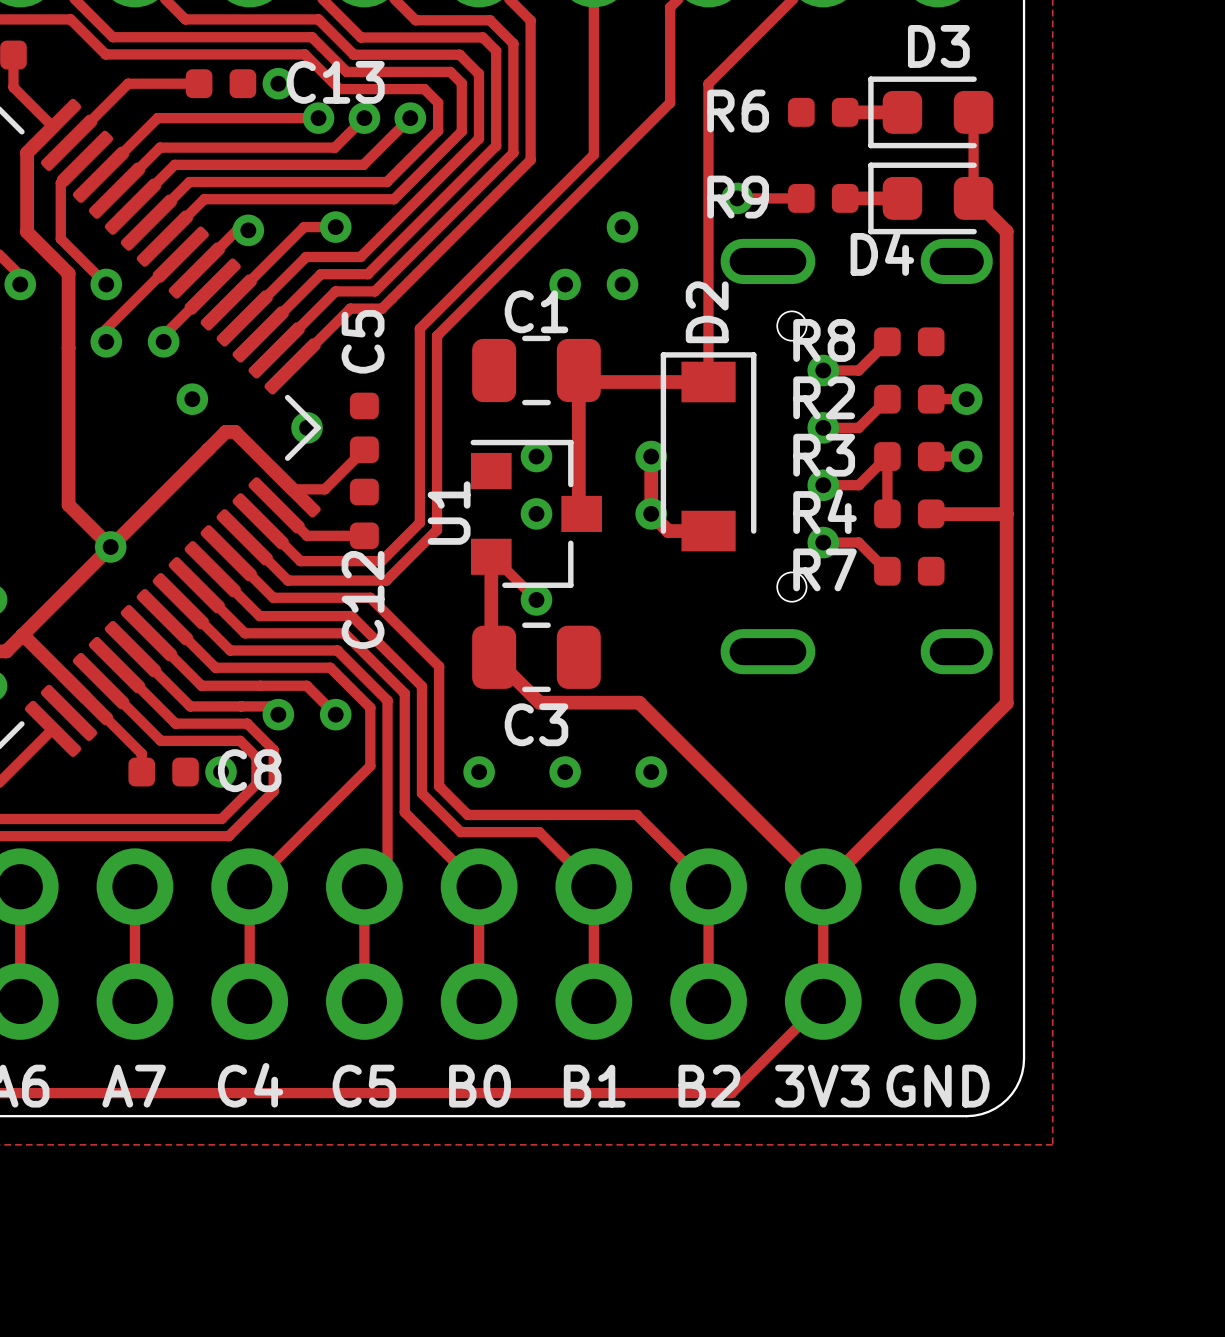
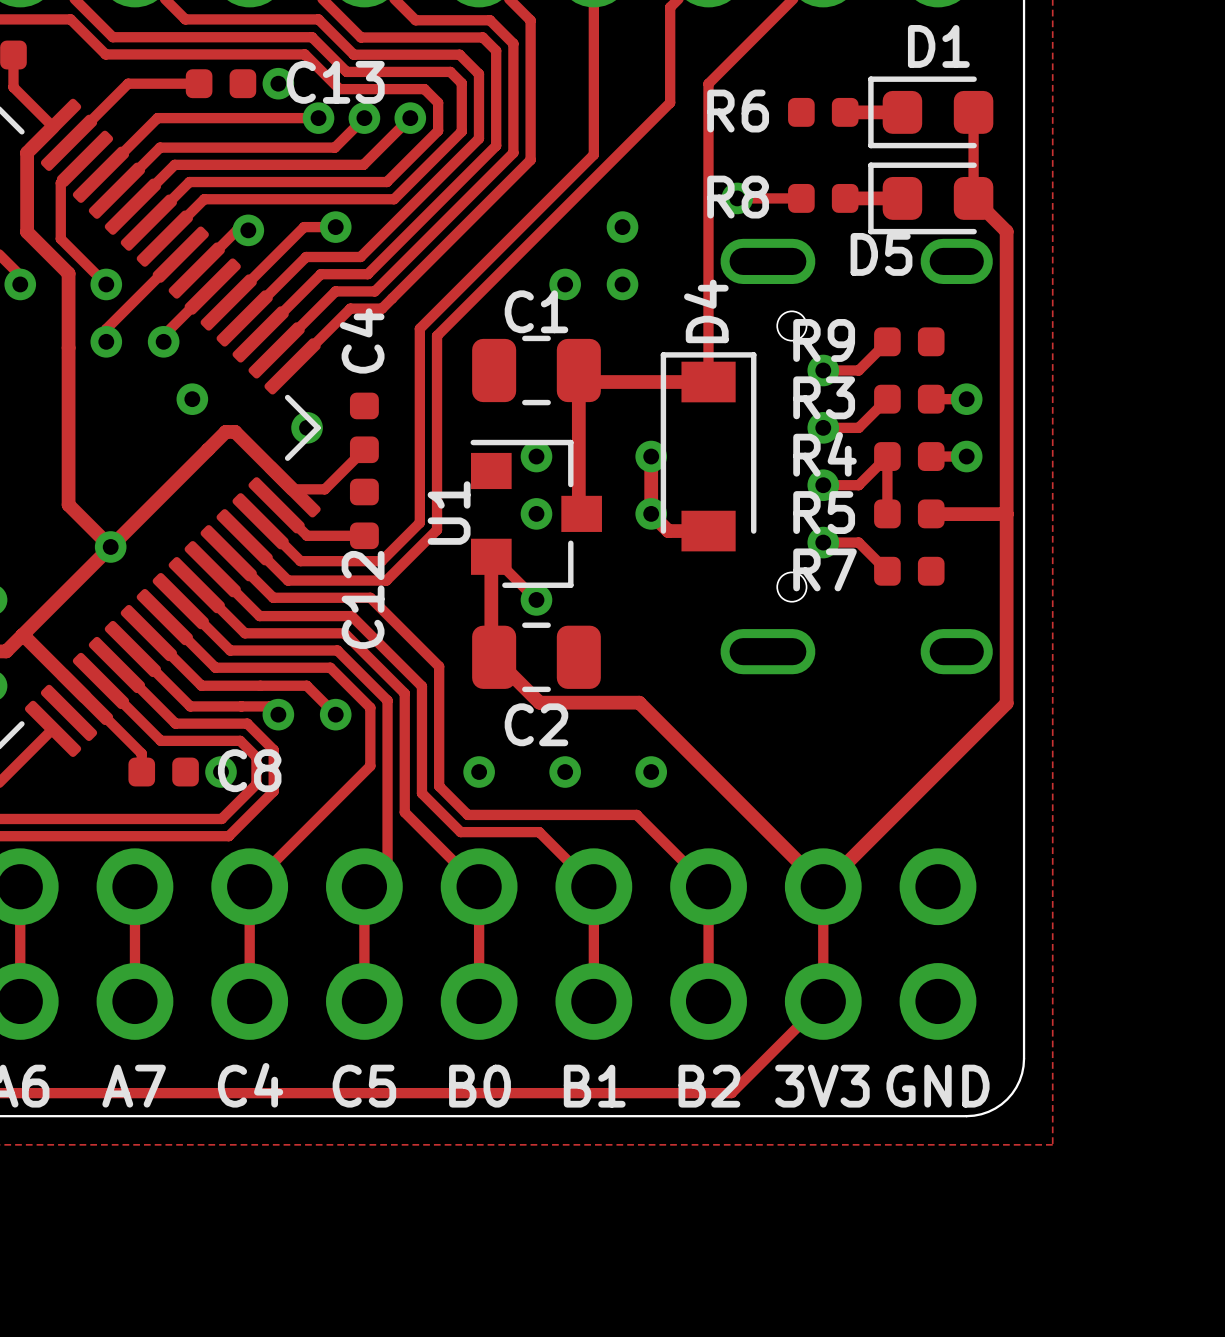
D3 name: D3 (938, 46) -> D1 (938, 46)
R9 name: R9 (738, 197) -> R8 (738, 197)
D4 name: D4 (882, 253) -> D5 (881, 254)
D2 name: D2 (707, 312) -> D4 (706, 311)
R8 name: R8 (824, 340) -> R9 (824, 340)
C5 name: C5 (363, 341) -> C4 (362, 340)
R2 name: R2 (824, 397) -> R3 (824, 397)
R3 name: R3 (824, 455) -> R4 (825, 454)
R4 name: R4 (825, 511) -> R5 (824, 512)
C3 name: C3 (536, 724) -> C2 (536, 724)

